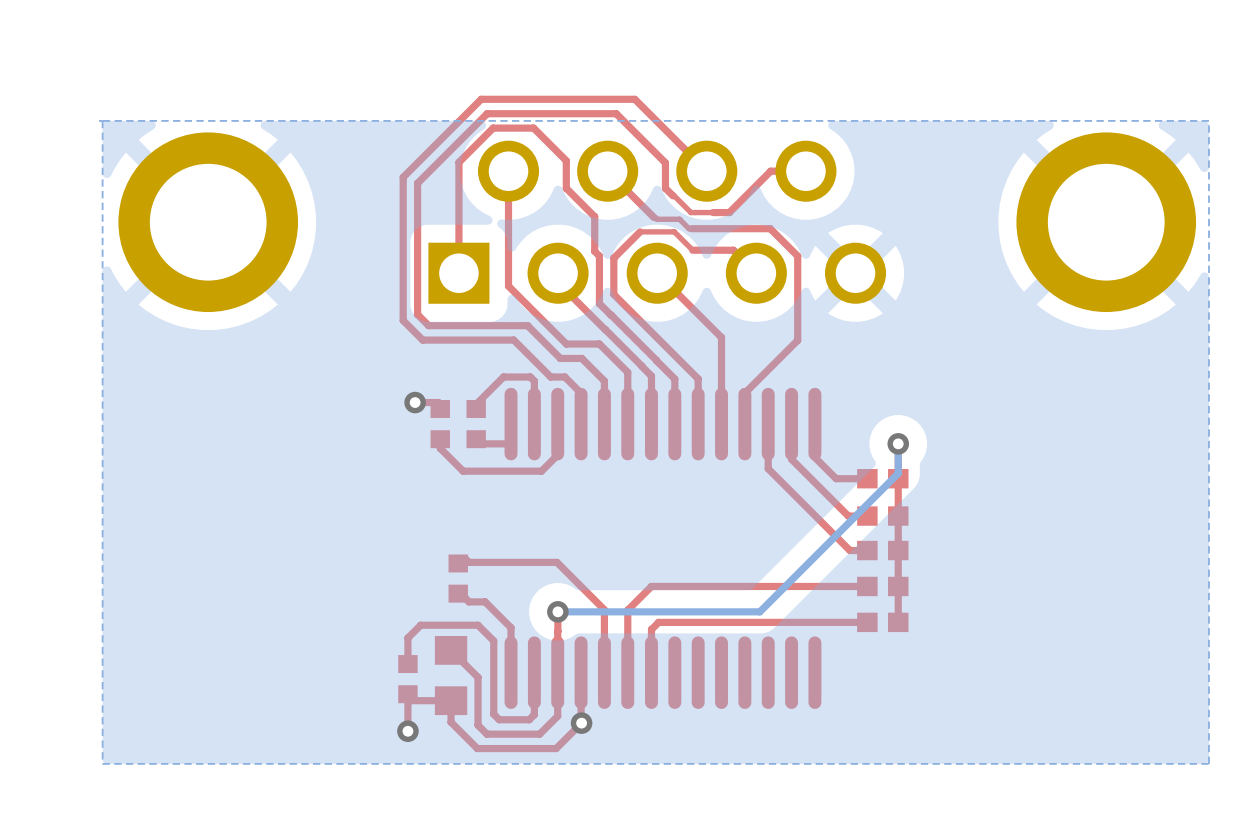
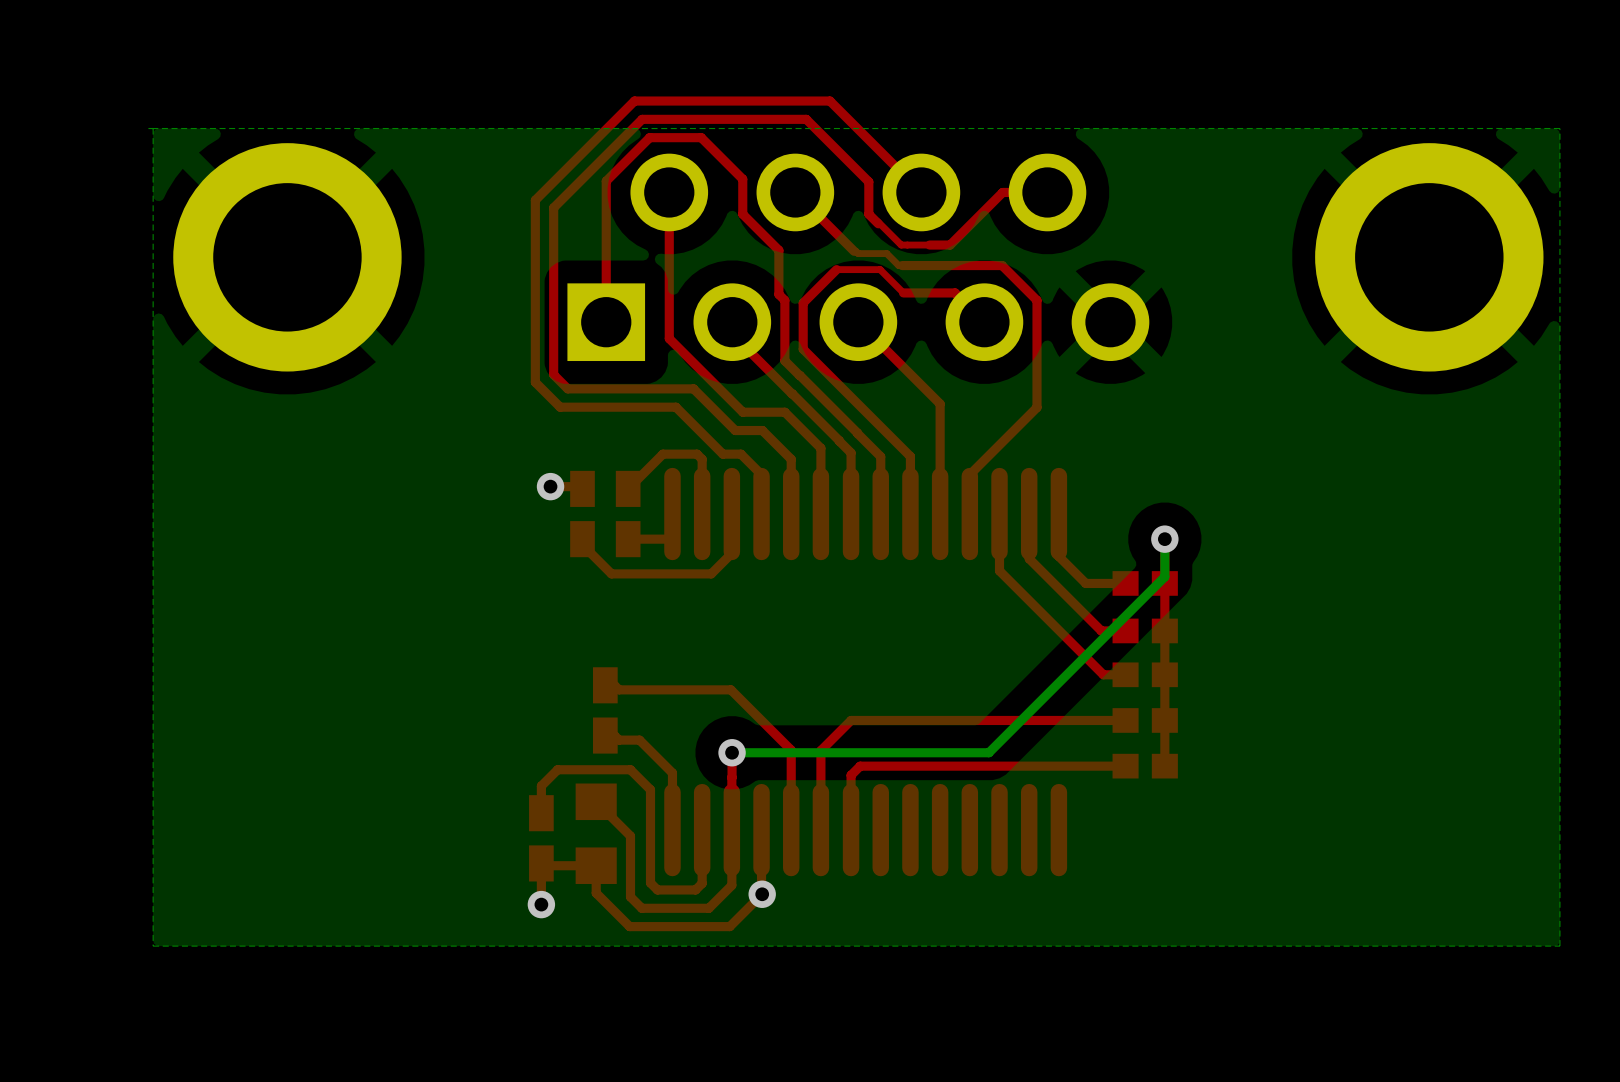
part footprint: [430, 400, 450, 449] -> [570, 470, 595, 558]
part footprint: [466, 400, 486, 449] -> [615, 470, 641, 558]
part footprint: [448, 554, 468, 603] -> [593, 667, 618, 754]
part footprint: [398, 655, 418, 704] -> [529, 795, 554, 882]

